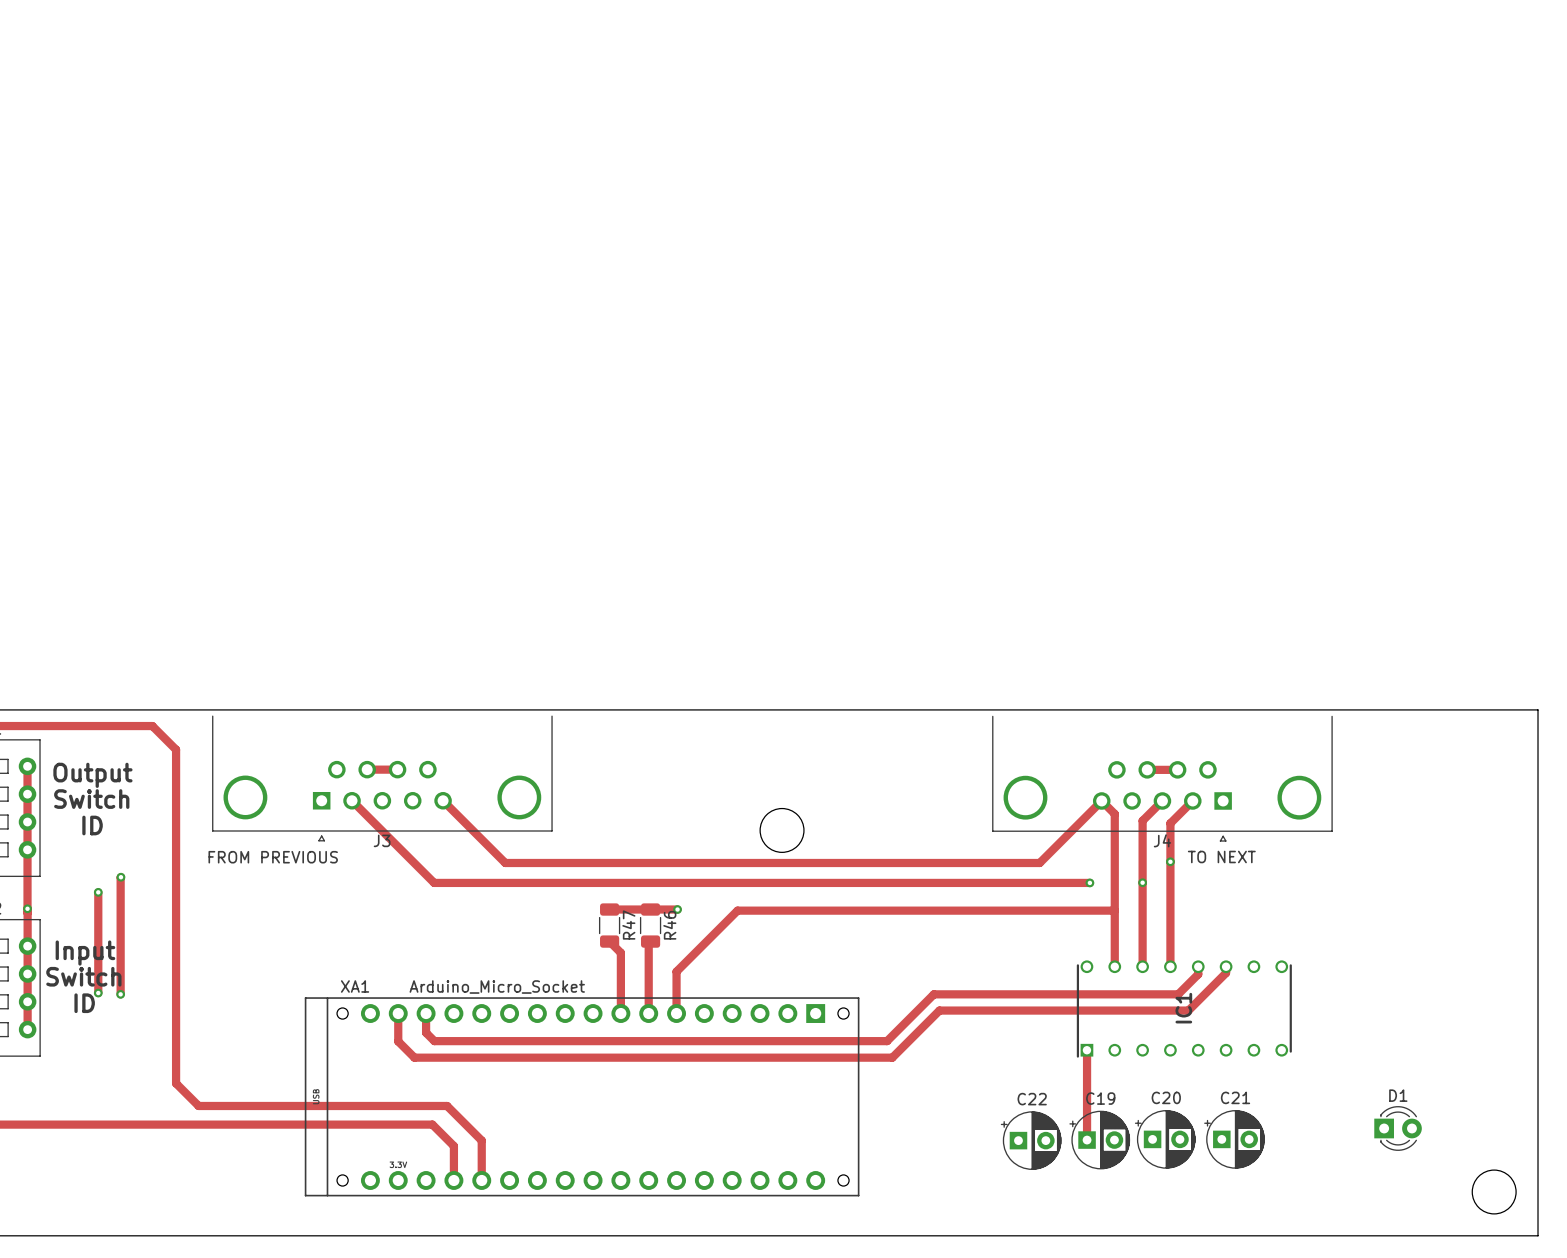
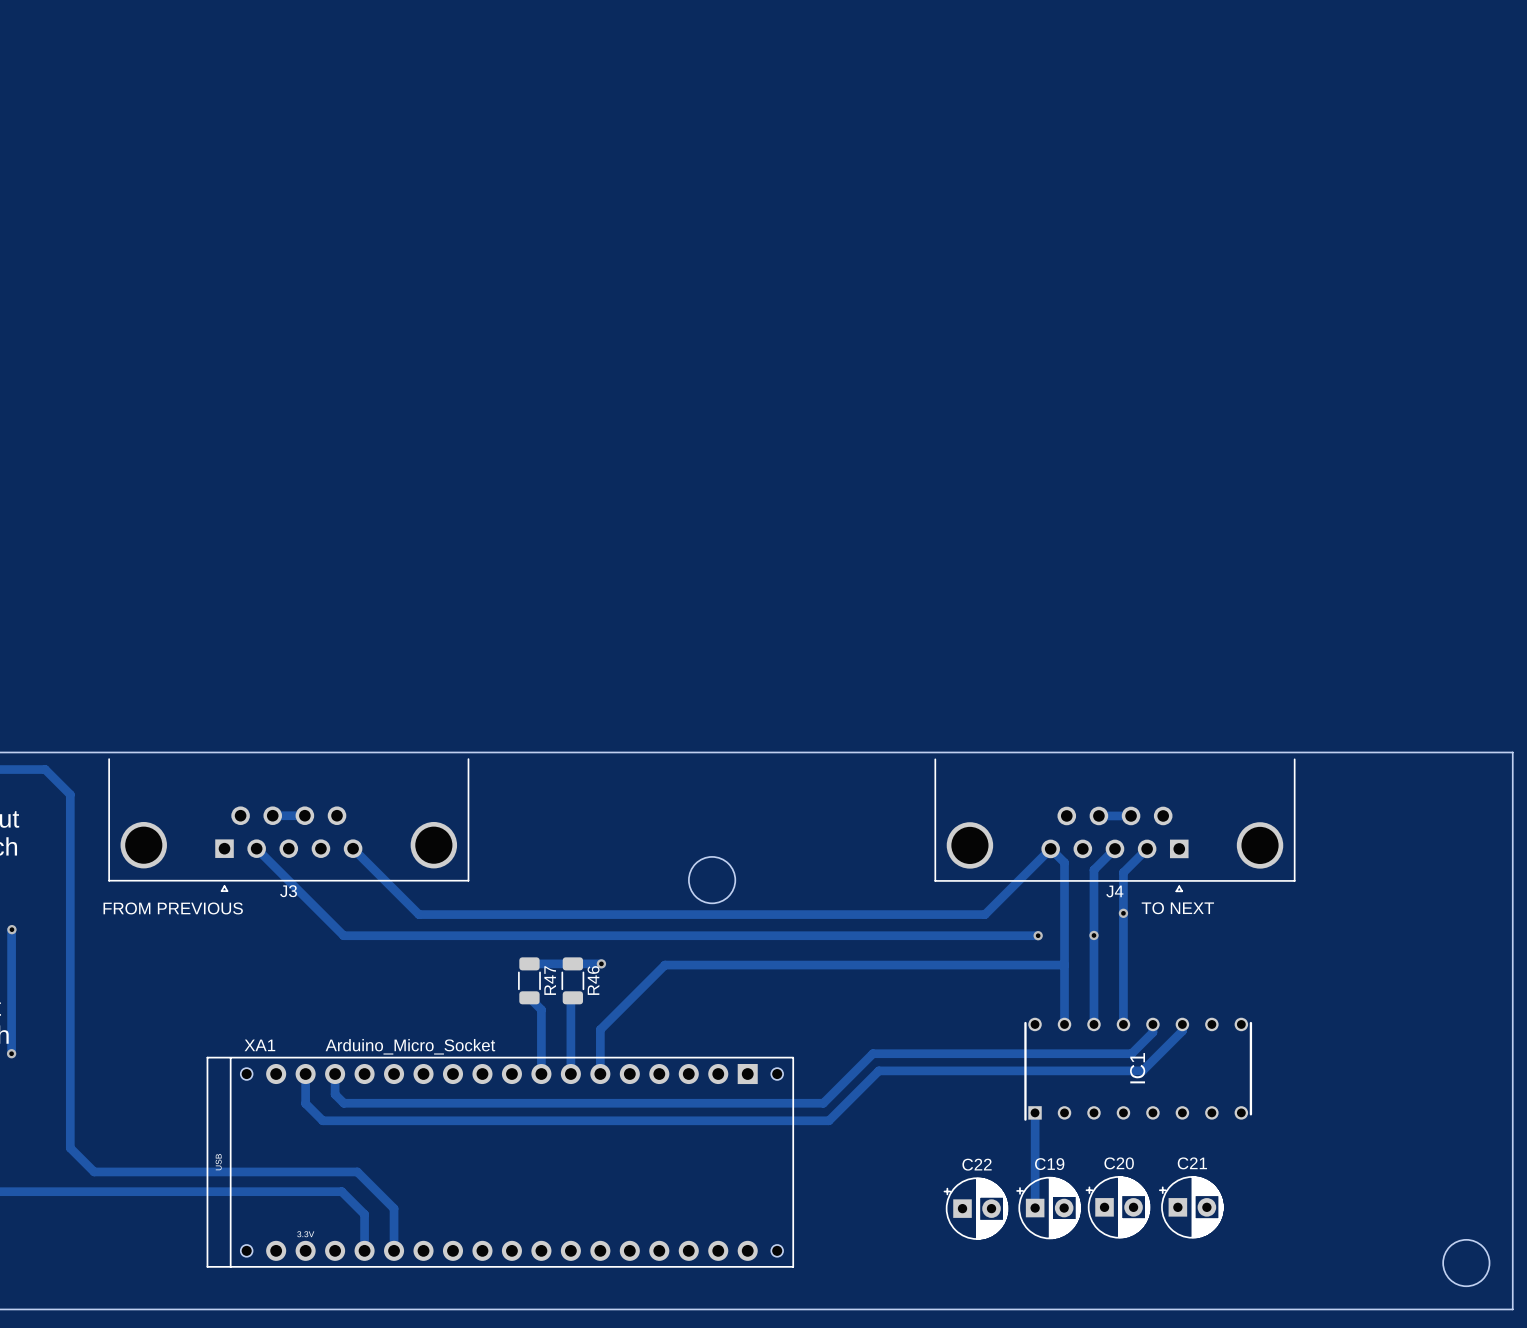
D1: (1398, 1128) -> none

